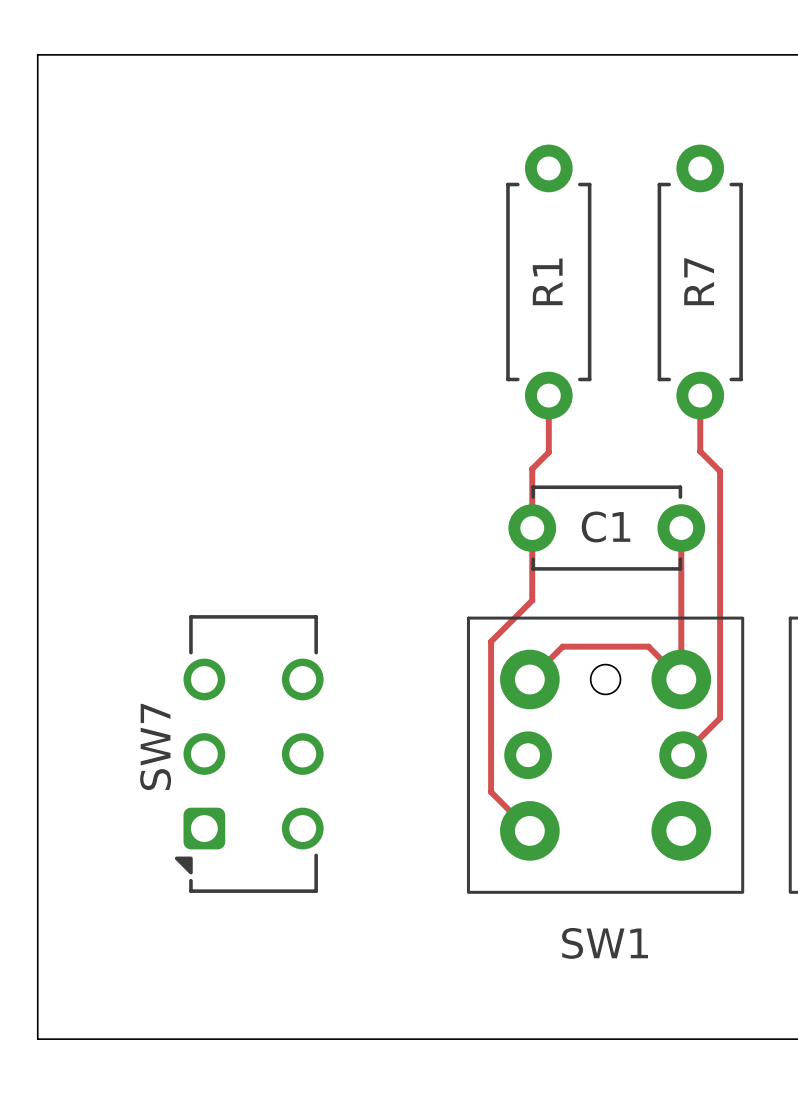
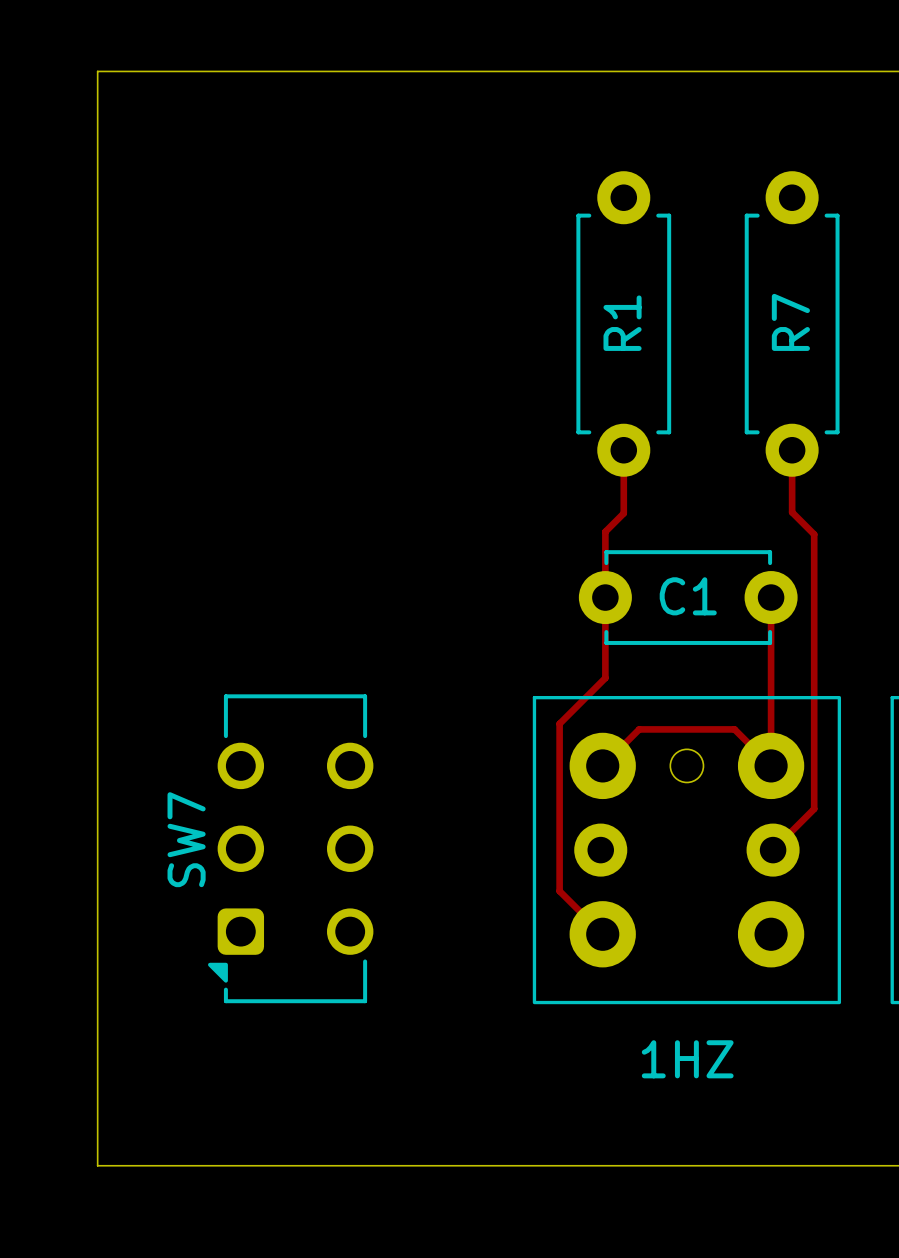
board edge: (75, 54) (37, 54) (37, 1039) (75, 1039) -> (97, 71) (97, 1165)
SW1 name: SW1 (605, 943) -> none
SW1 value: none -> 1HZ (687, 1059)

